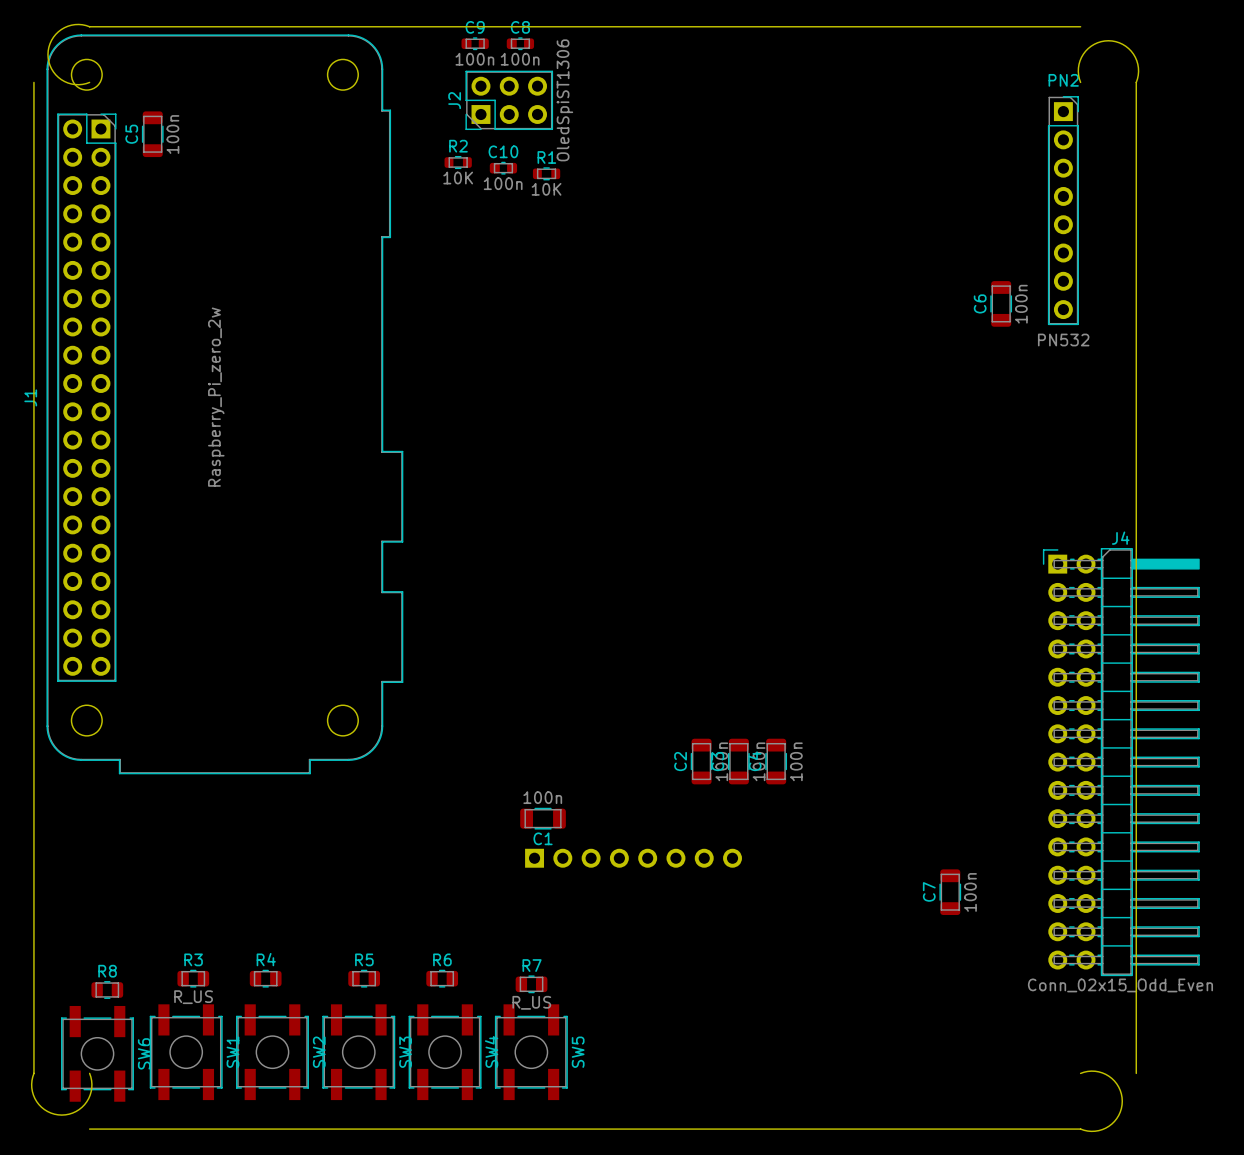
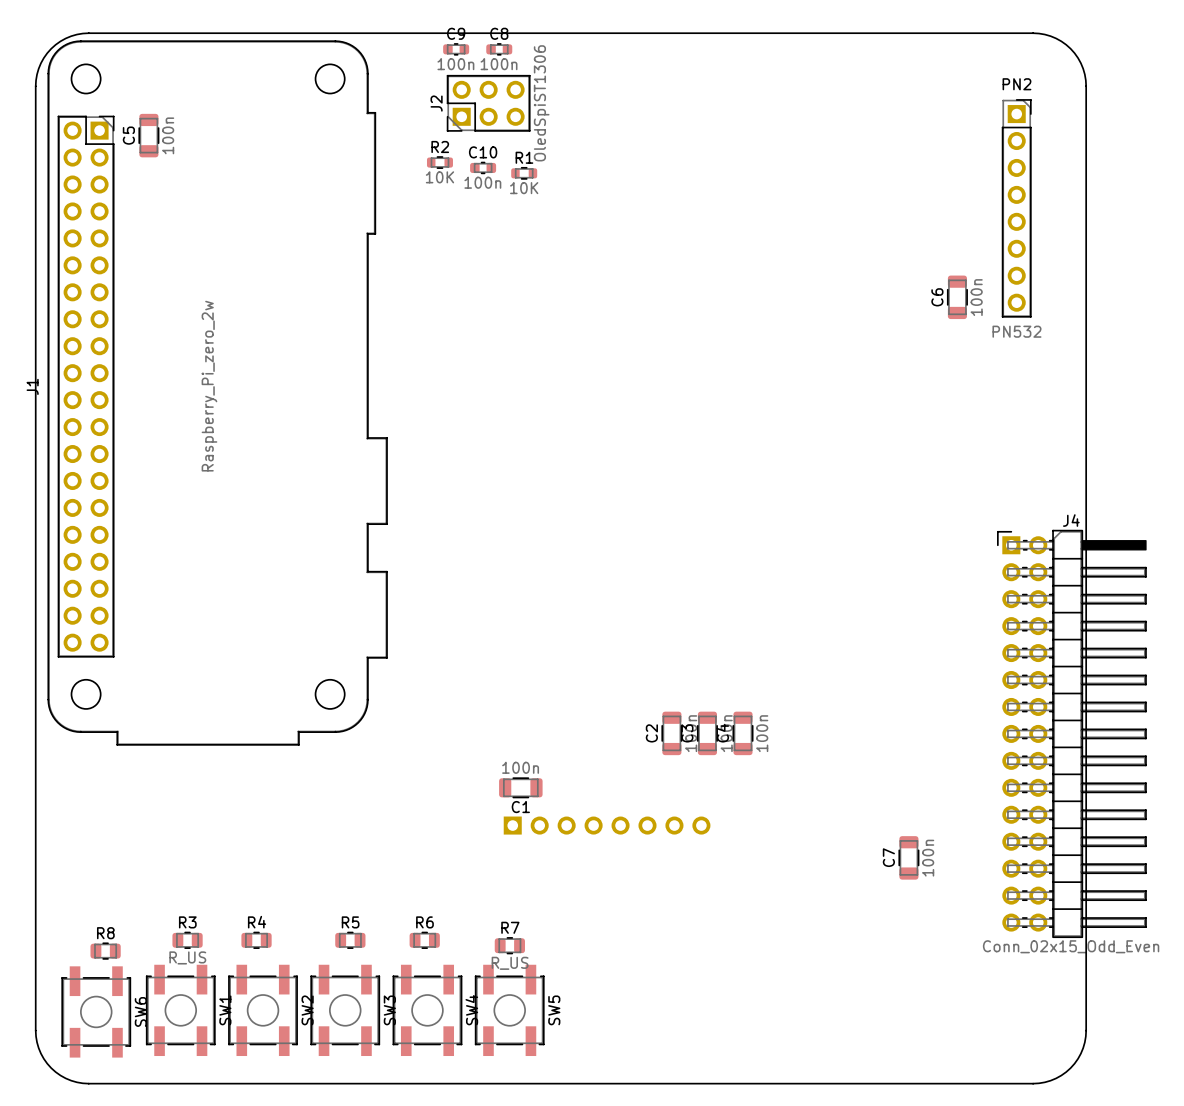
board edge: (89, 26) (75, 24) (61, 29) (51, 40) (47, 54) (51, 68) (61, 79) (75, 84) (89, 82) -> (88, 33) (71, 36) (51, 48) (38, 68) (35, 86)
board edge: (1080, 82) (1078, 67) (1083, 54) (1094, 44) (1108, 40) (1122, 44) (1133, 54) (1138, 67) (1136, 82) -> (1033, 33) (1056, 38) (1070, 48) (1080, 63) (1086, 86)
board edge: (33, 1073) (31, 1087) (36, 1101) (47, 1111) (61, 1115) (76, 1111) (86, 1101) (91, 1087) (89, 1073) -> (35, 1030) (38, 1048) (51, 1068) (71, 1080) (88, 1083)
board edge: (1080, 1073) (1095, 1071) (1108, 1076) (1118, 1087) (1122, 1101) (1118, 1115) (1108, 1126) (1095, 1131) (1080, 1129) -> (1086, 1030) (1080, 1053) (1070, 1068) (1056, 1078) (1033, 1083)

